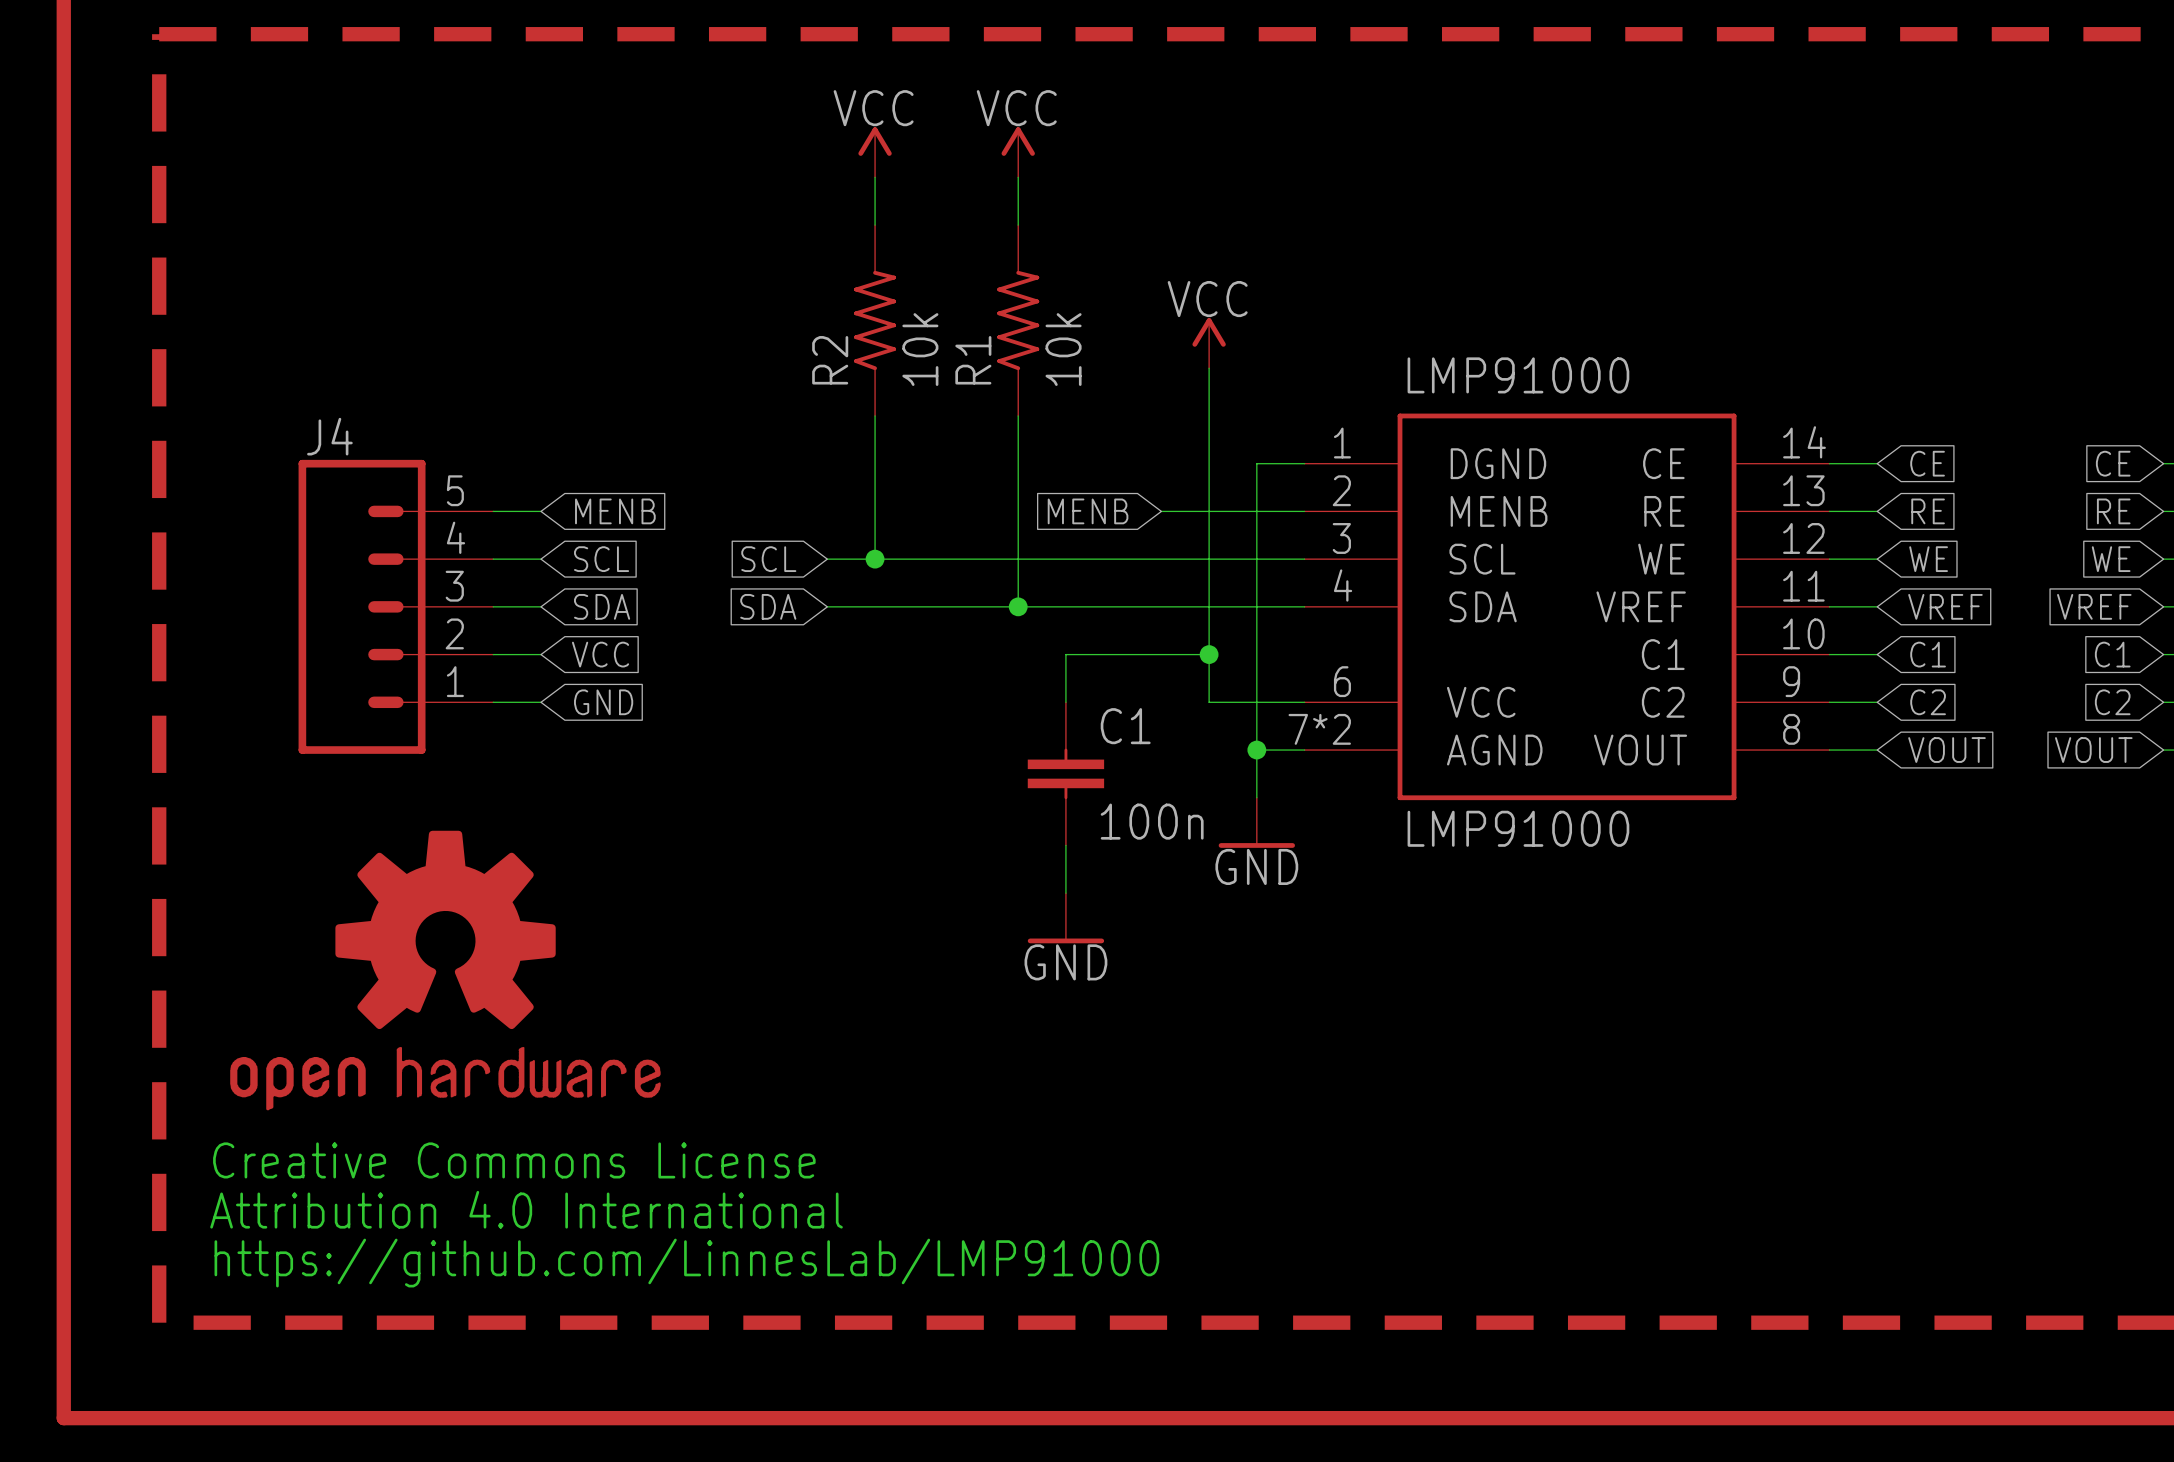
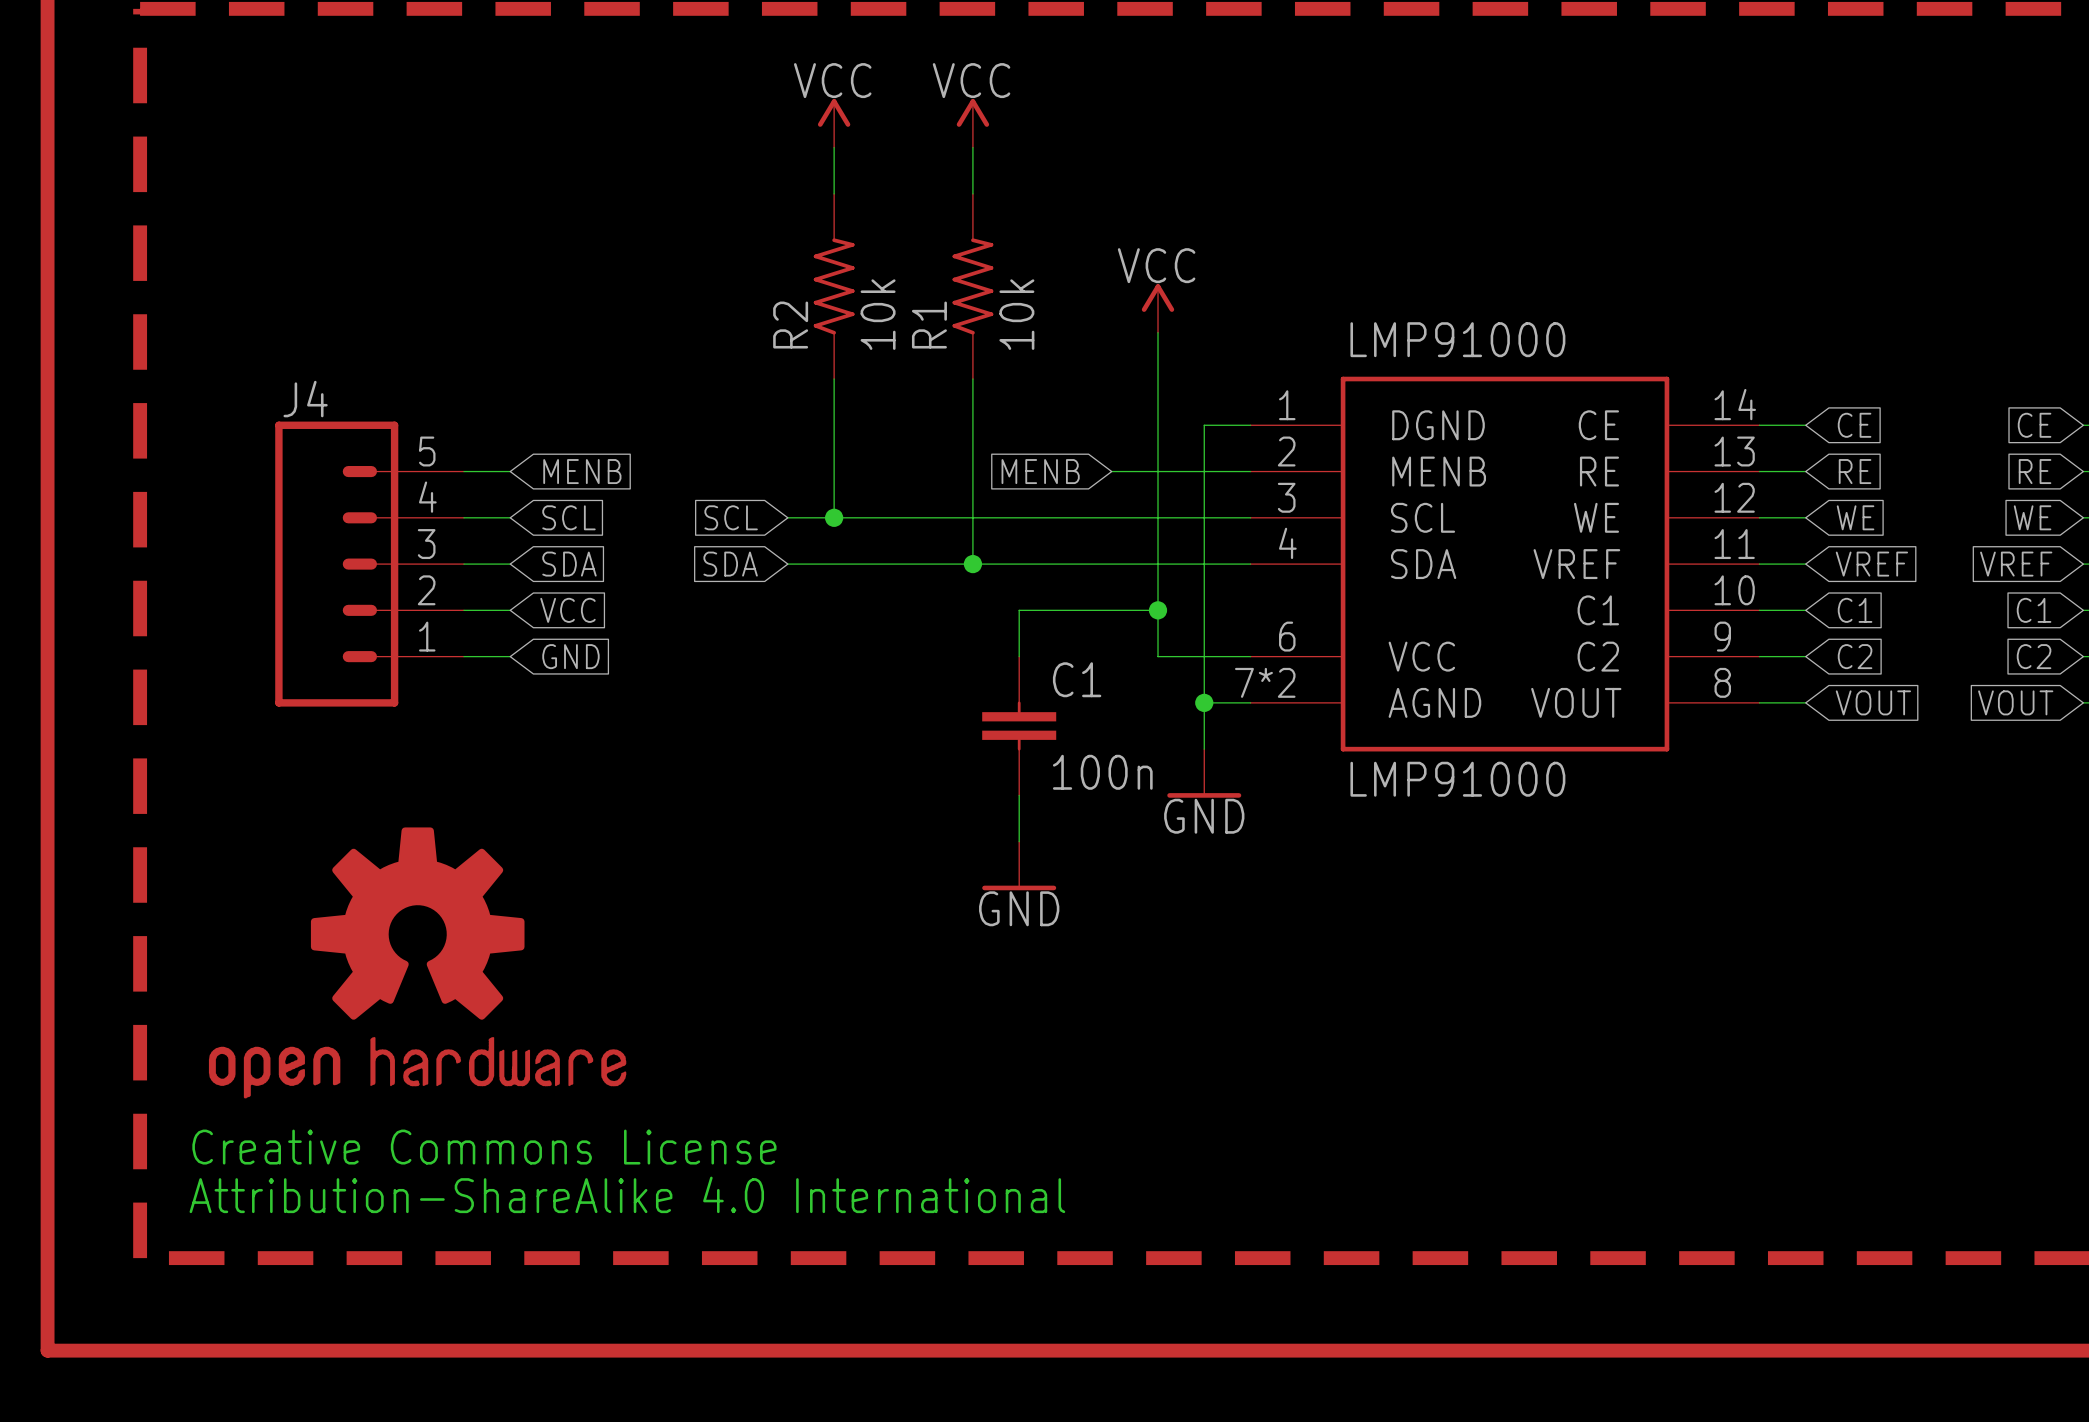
part position: (445, 970) -> (417, 962)
text: Creative Commons License (514, 1160) -> none
text: Attribution 4.0 International (526, 1209) -> Creative Commons License (484, 1147)
text: https://github.com/LinnesLab/LMP91000 (686, 1263) -> Attribution-ShareAlike 4.0 International (627, 1194)

